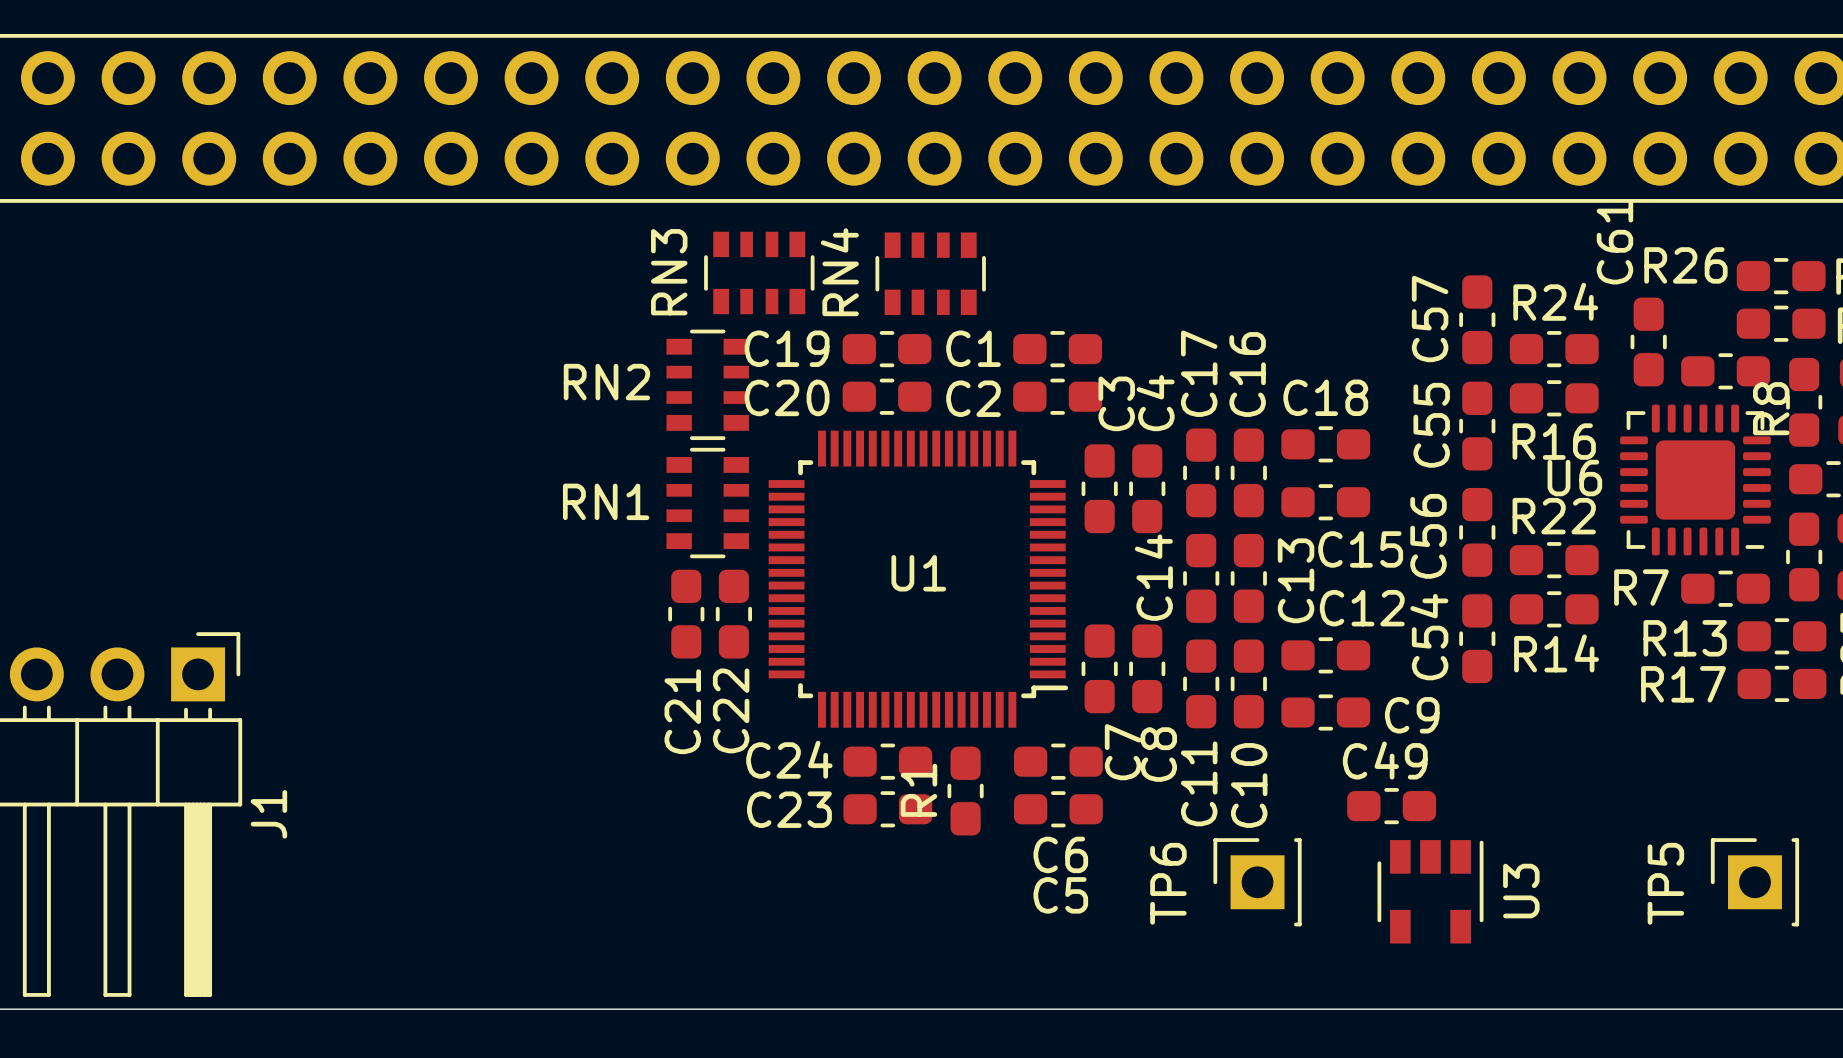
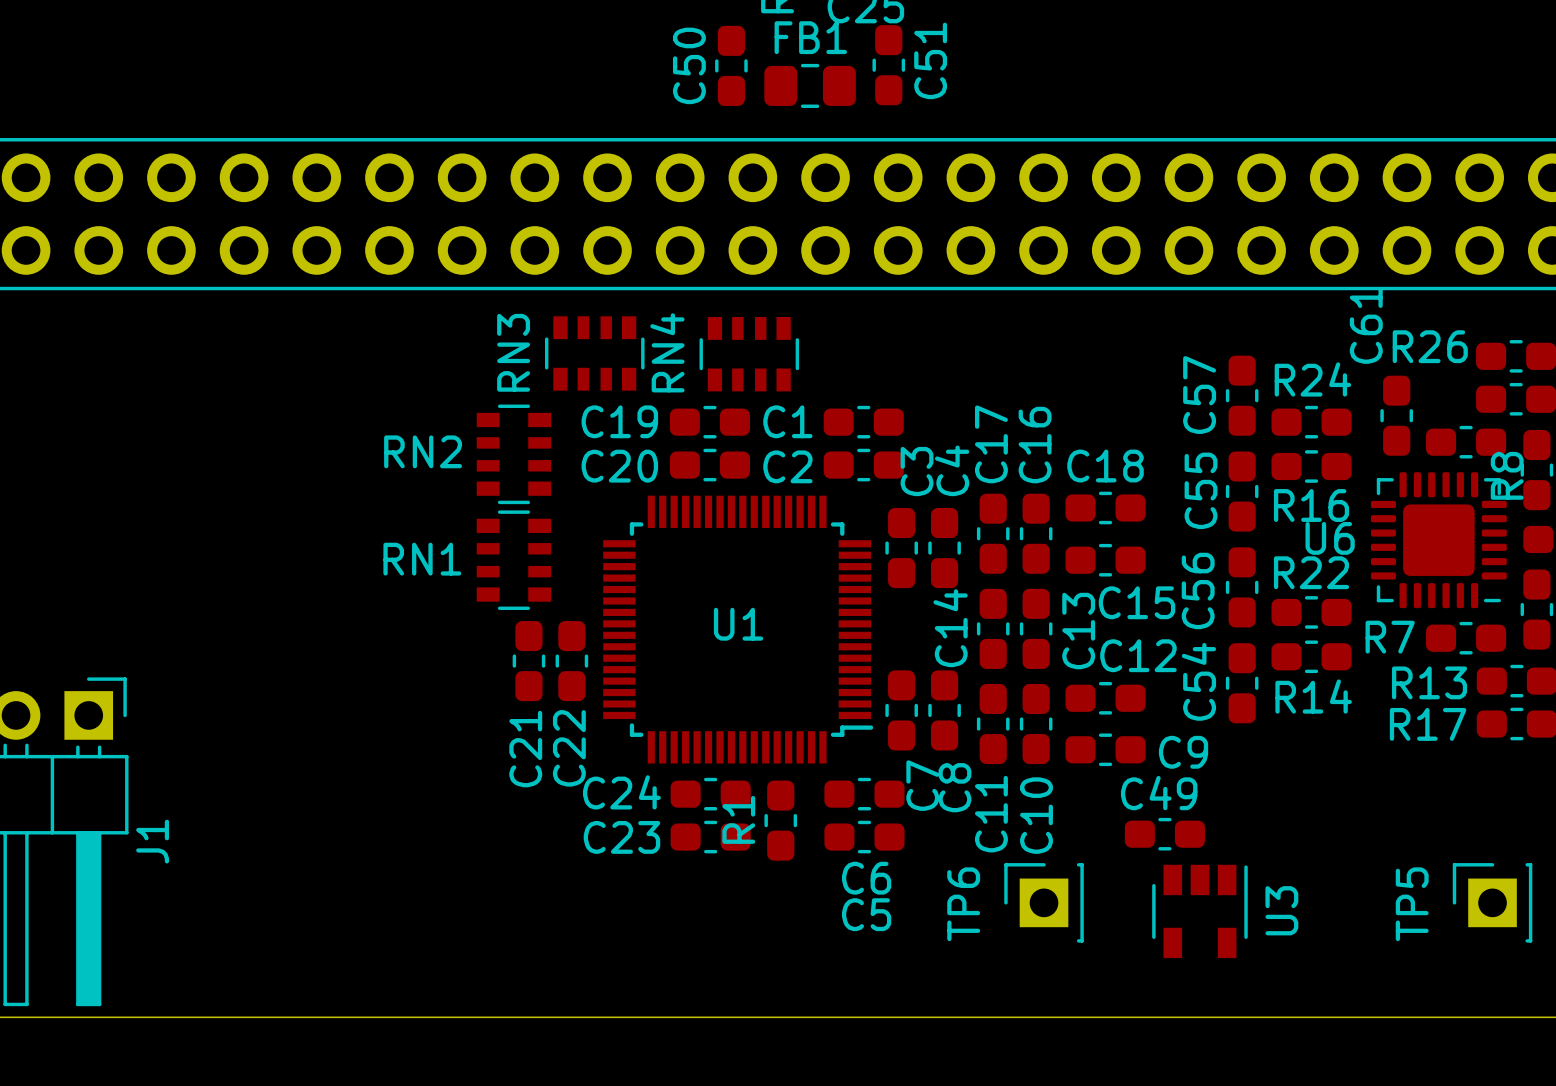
RN2 position: (707, 384) -> (513, 454)
RN1 position: (707, 503) -> (513, 560)

